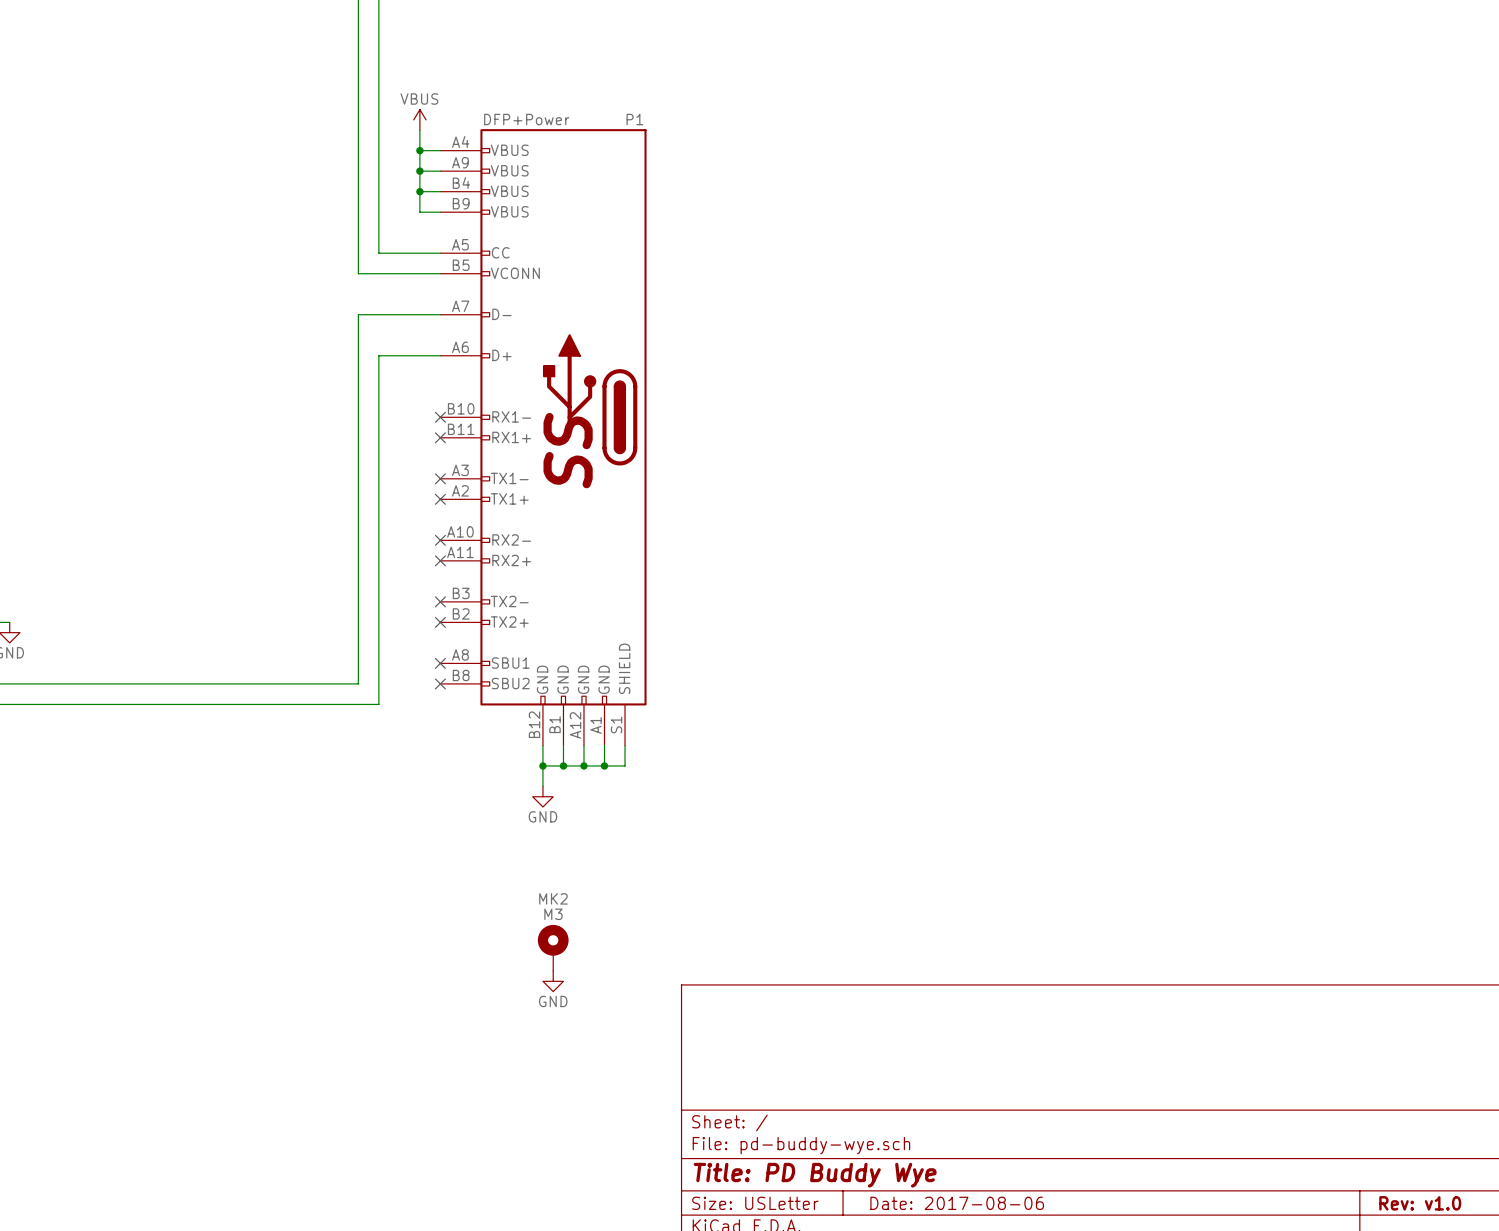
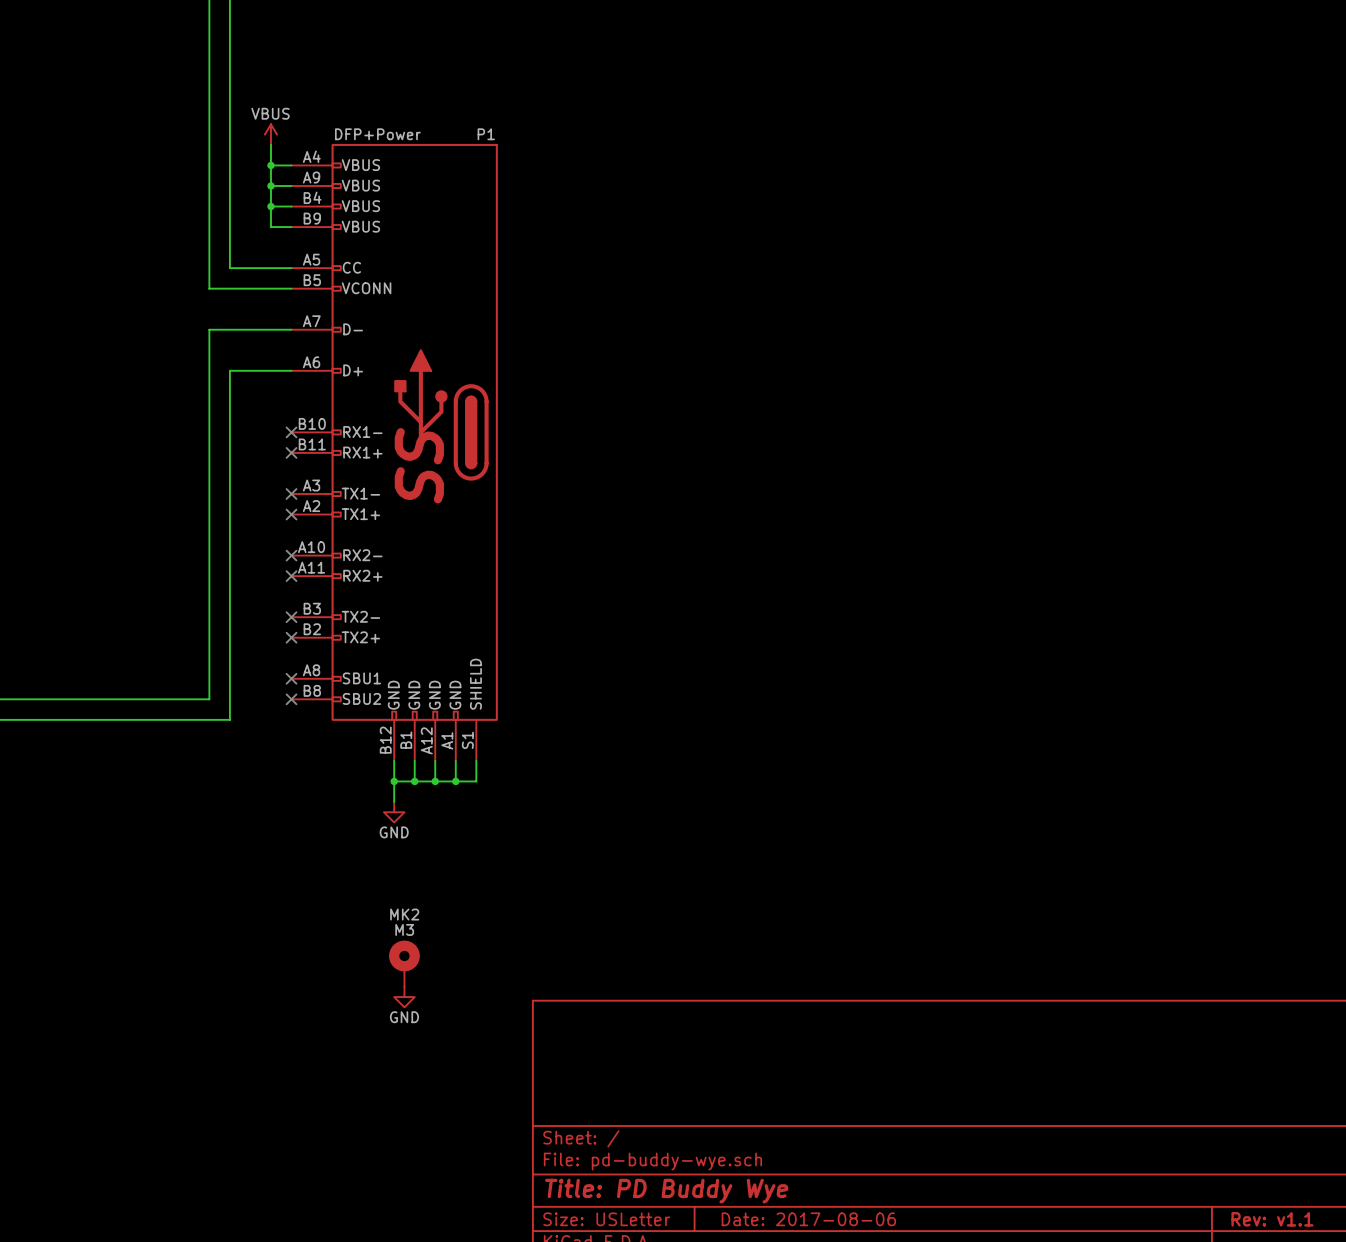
title block: Rev: v1.0 (1420, 1203) -> Rev: v1.1 (1272, 1219)

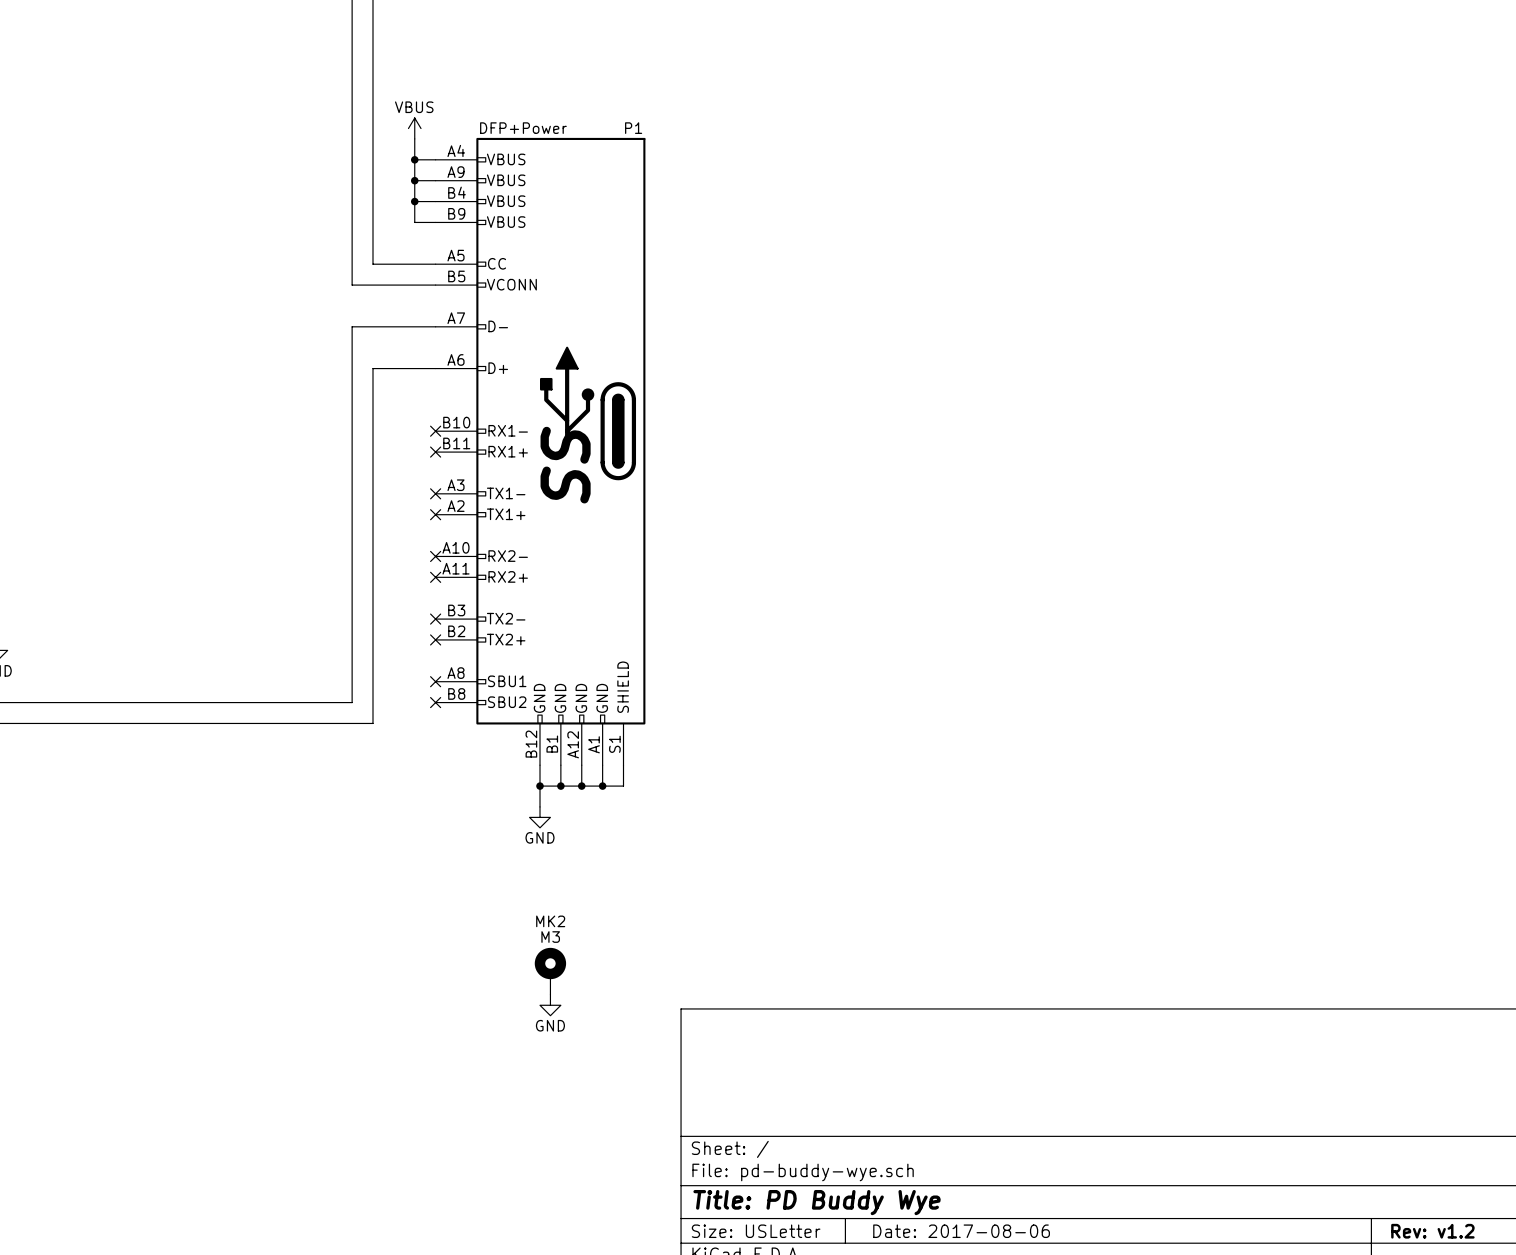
title block: Rev: v1.1 (1272, 1219) -> Rev: v1.2 (1432, 1231)

